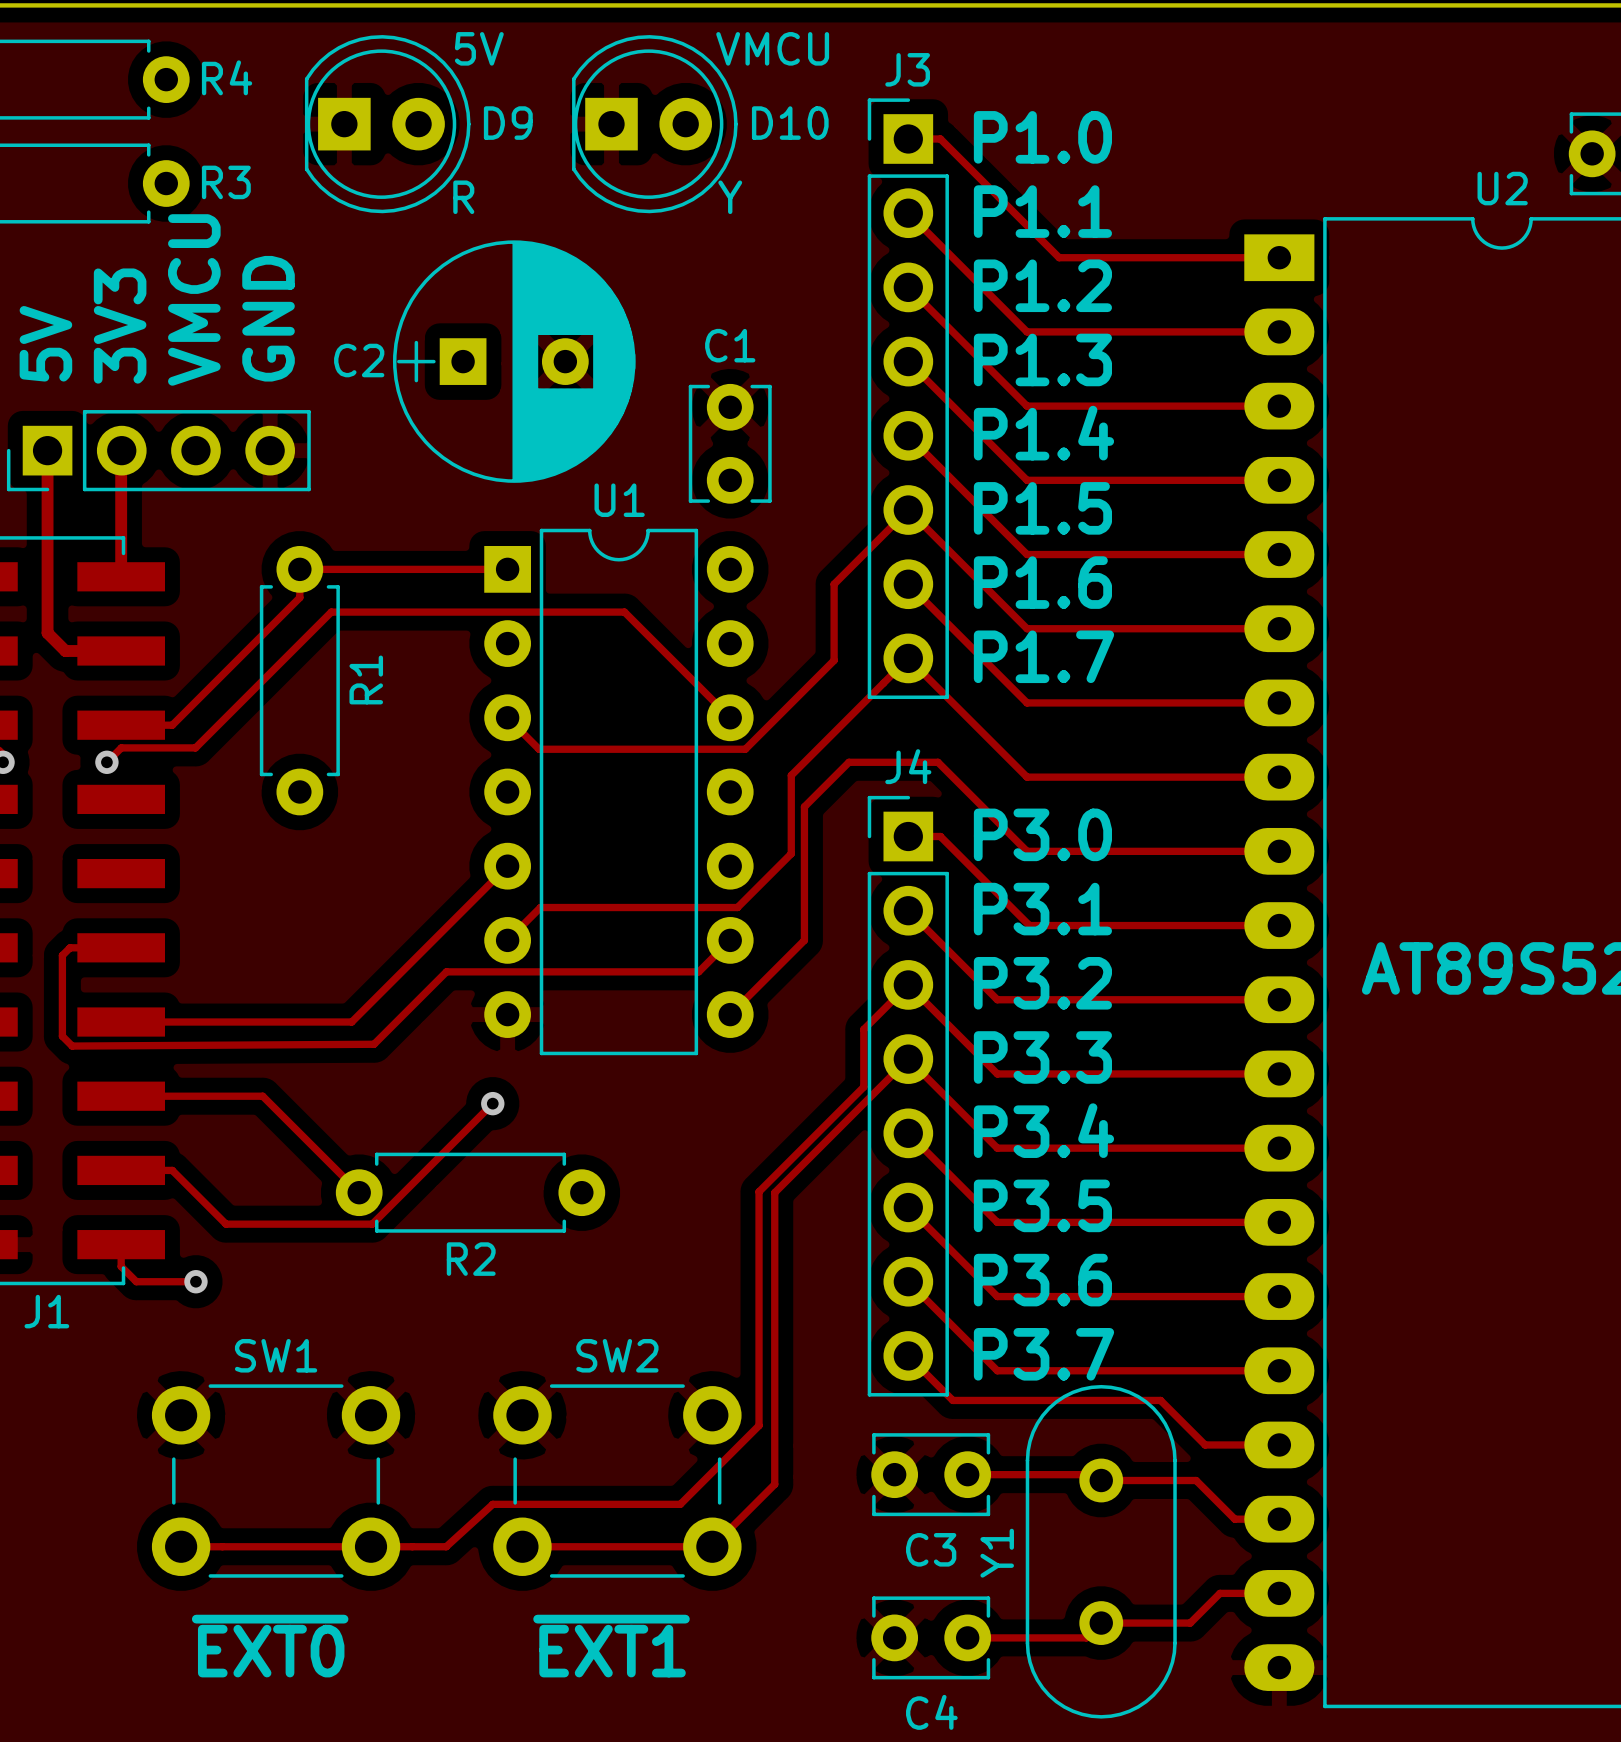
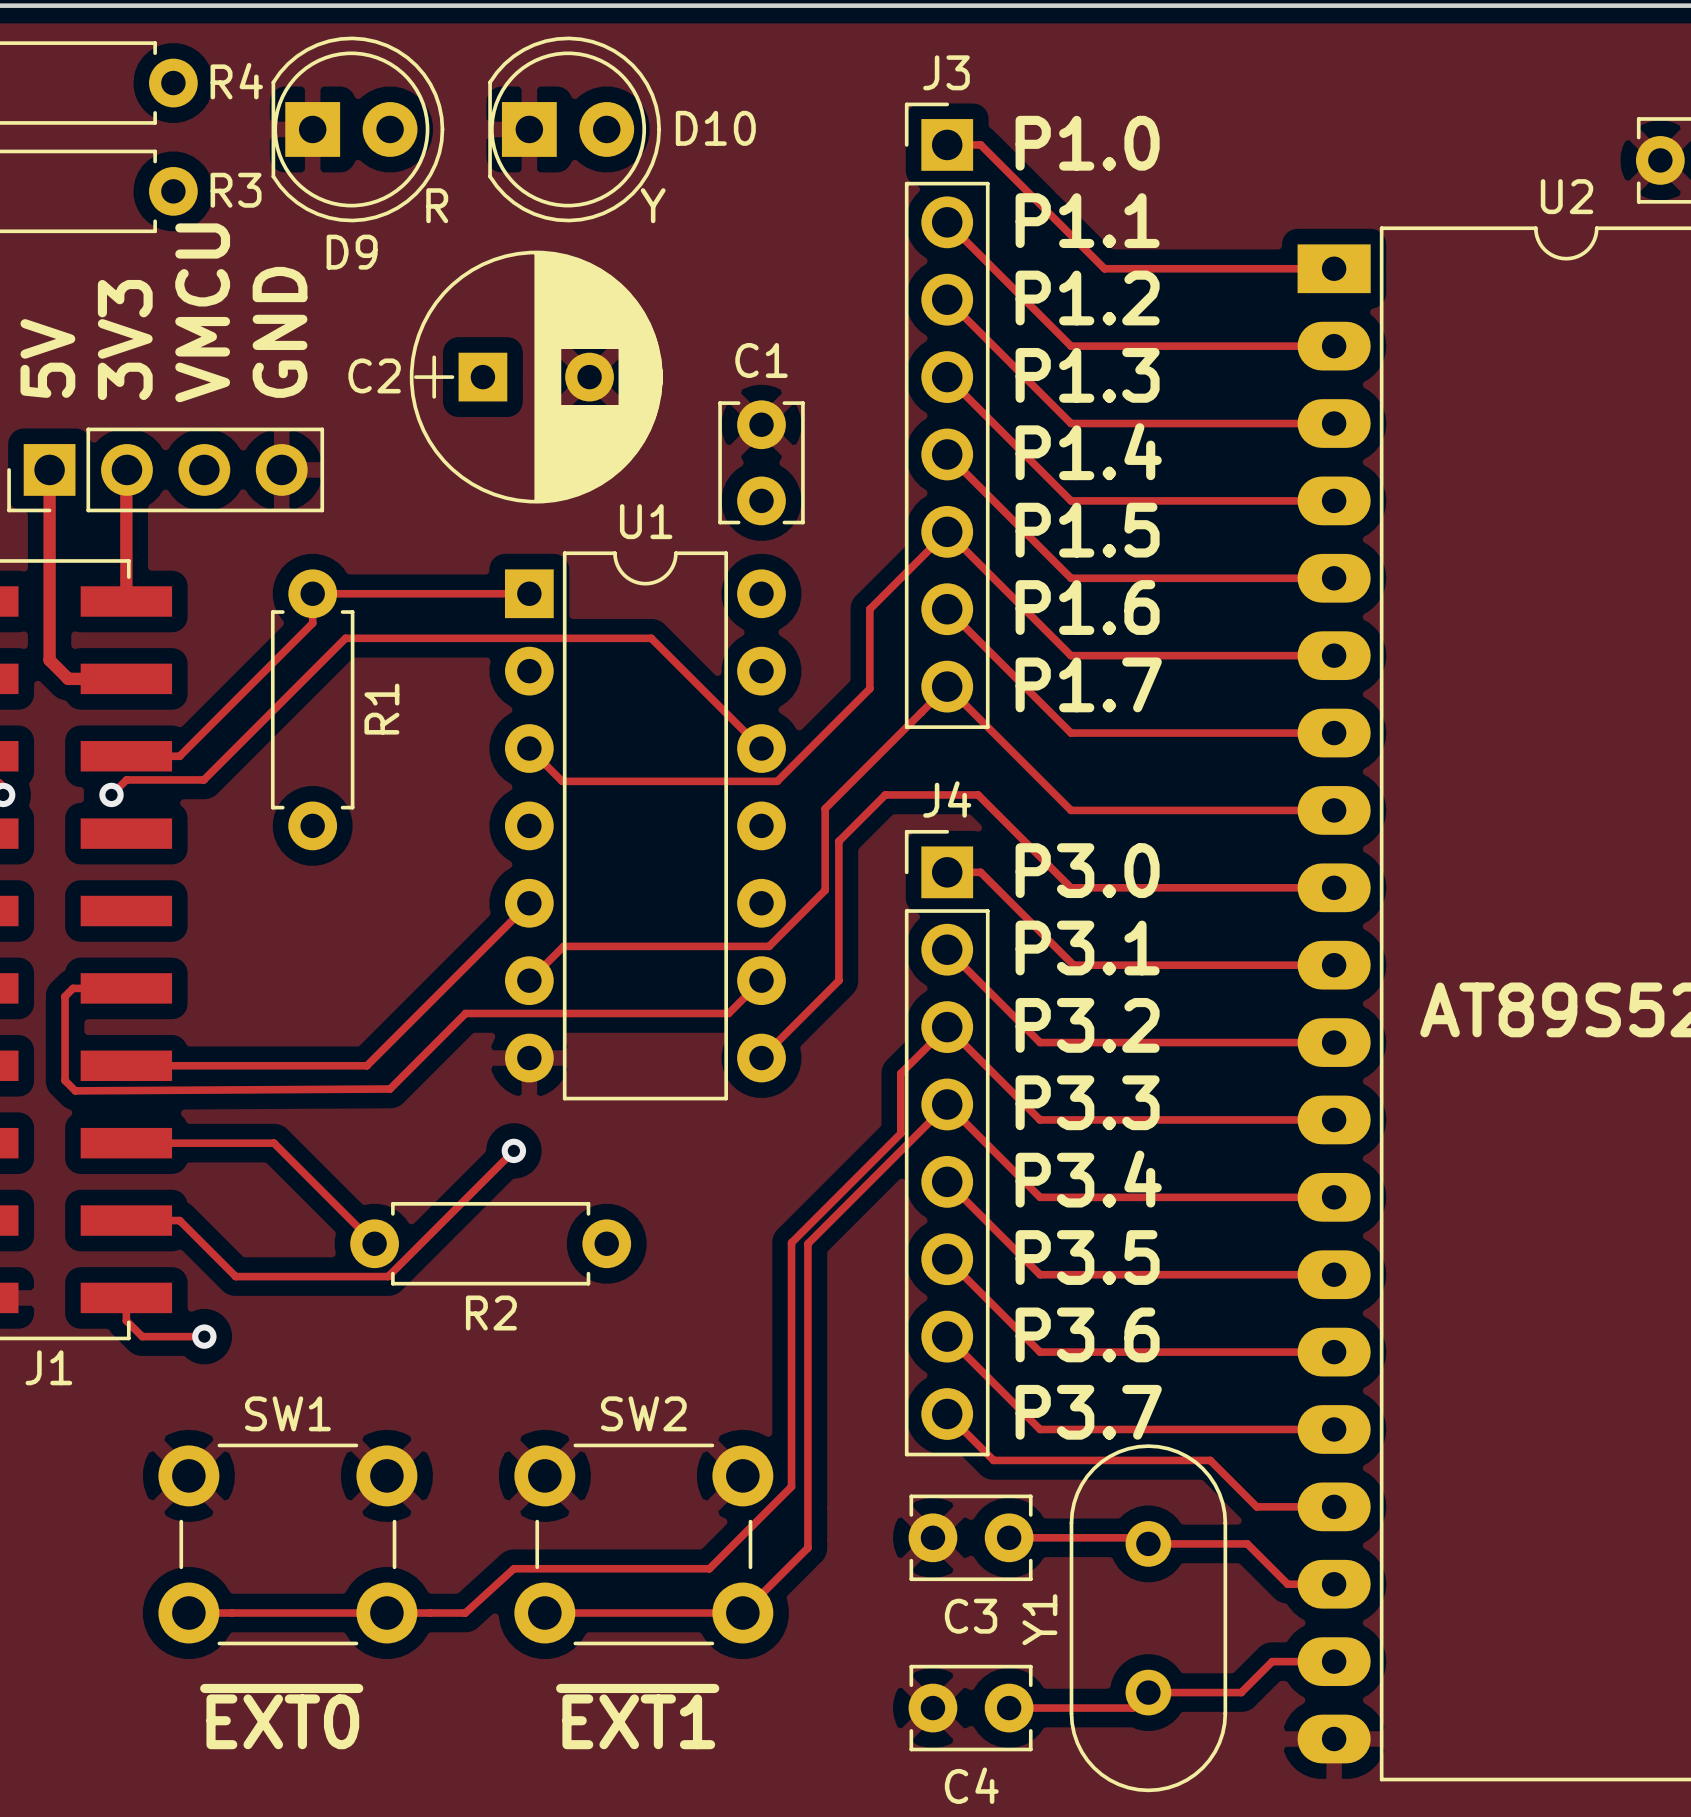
text: 5V (479, 48) -> none
text: VMCU (772, 48) -> none
D9 name position: D9 (508, 123) -> D9 (352, 252)
D9 position: (387, 124) -> (357, 129)
D10 position: (654, 124) -> (574, 129)
text position: R (463, 197) -> R (437, 205)
text position: Y (730, 197) -> Y (653, 205)

